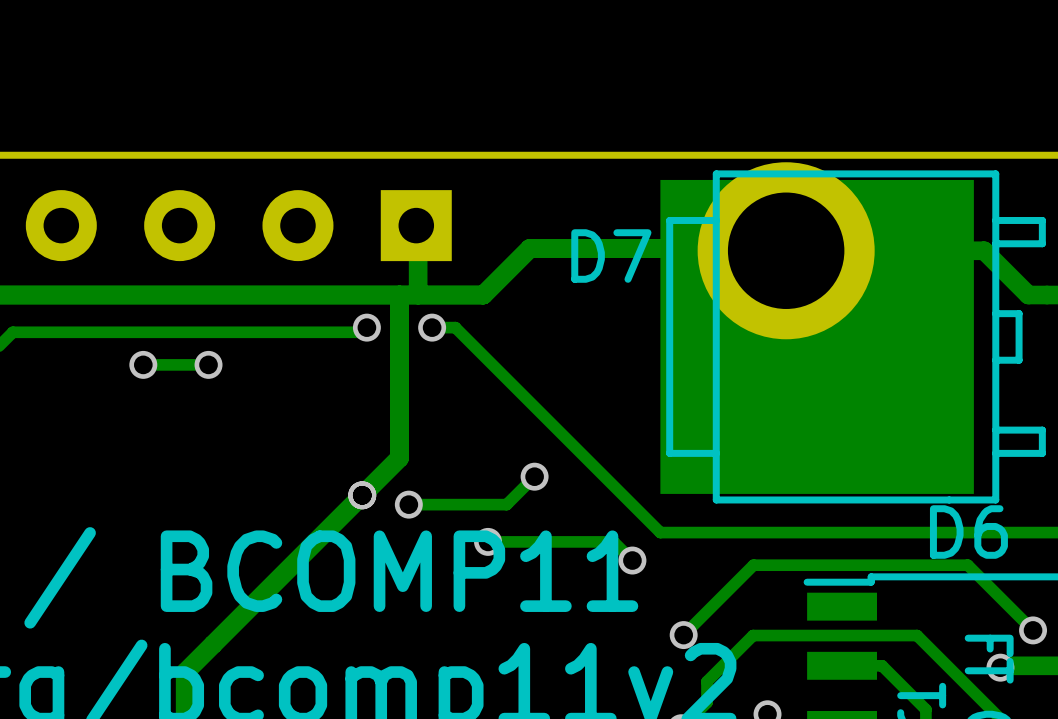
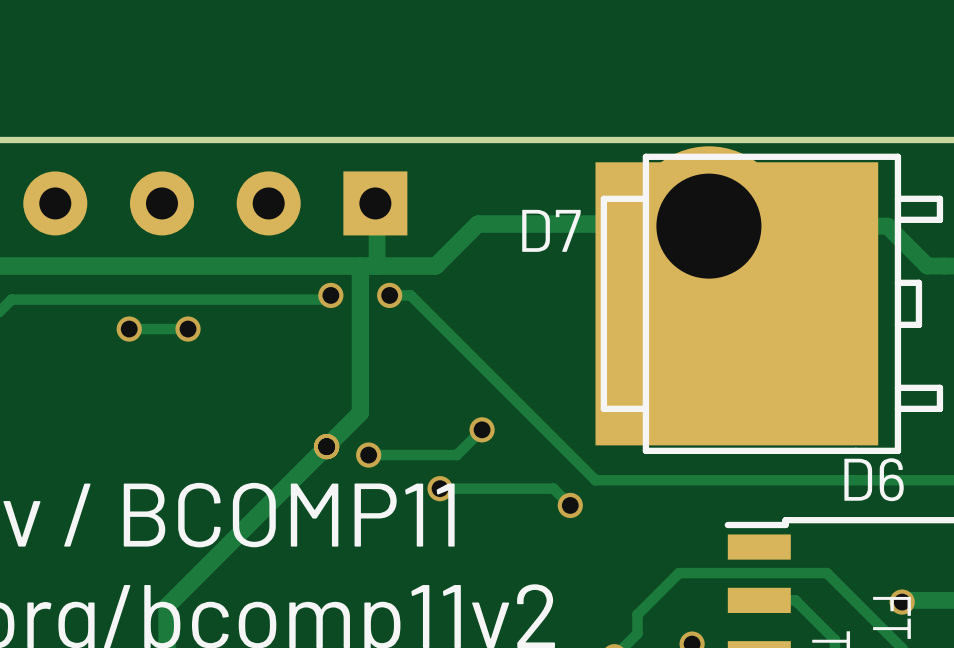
track: (1033, 630) (967, 565) (753, 565) (683, 635) -> none
via: (1033, 630) -> none
via: (683, 635) -> none

